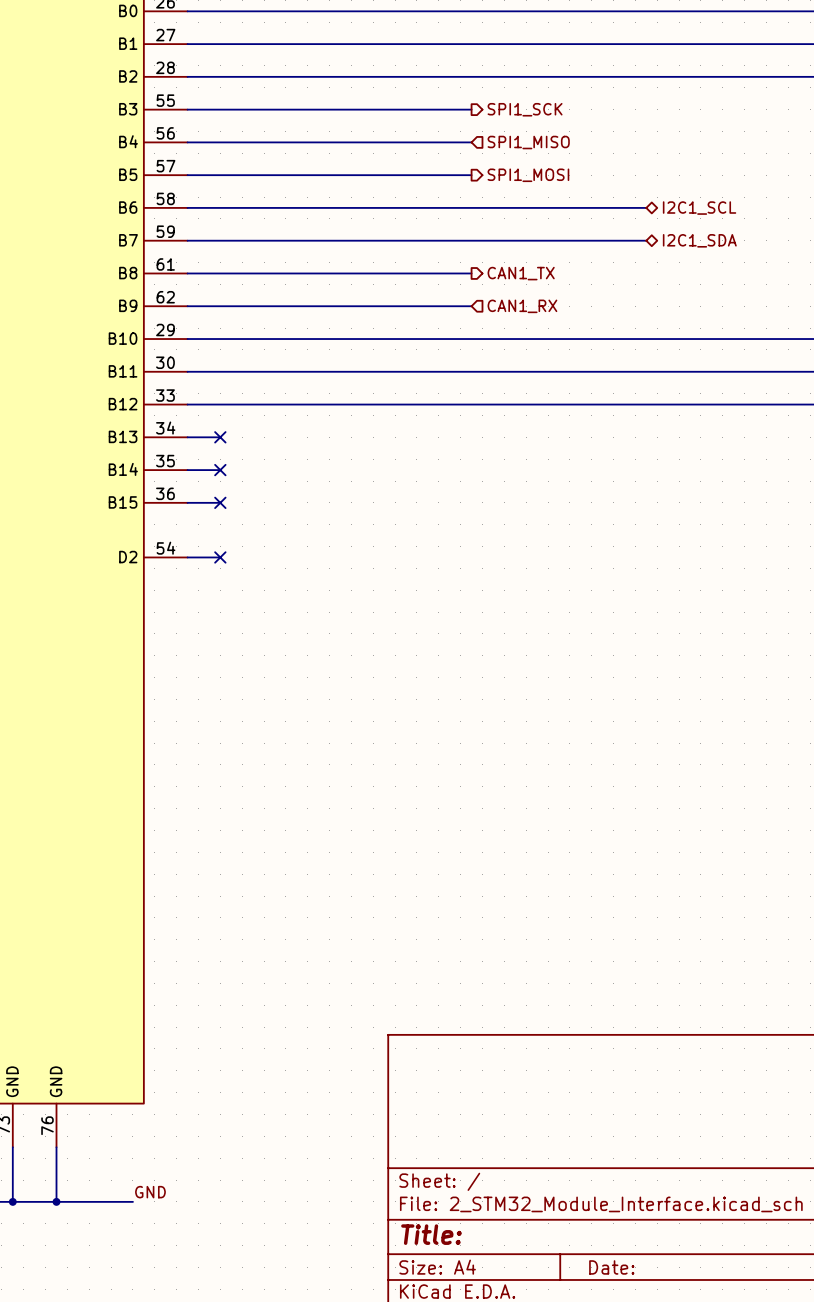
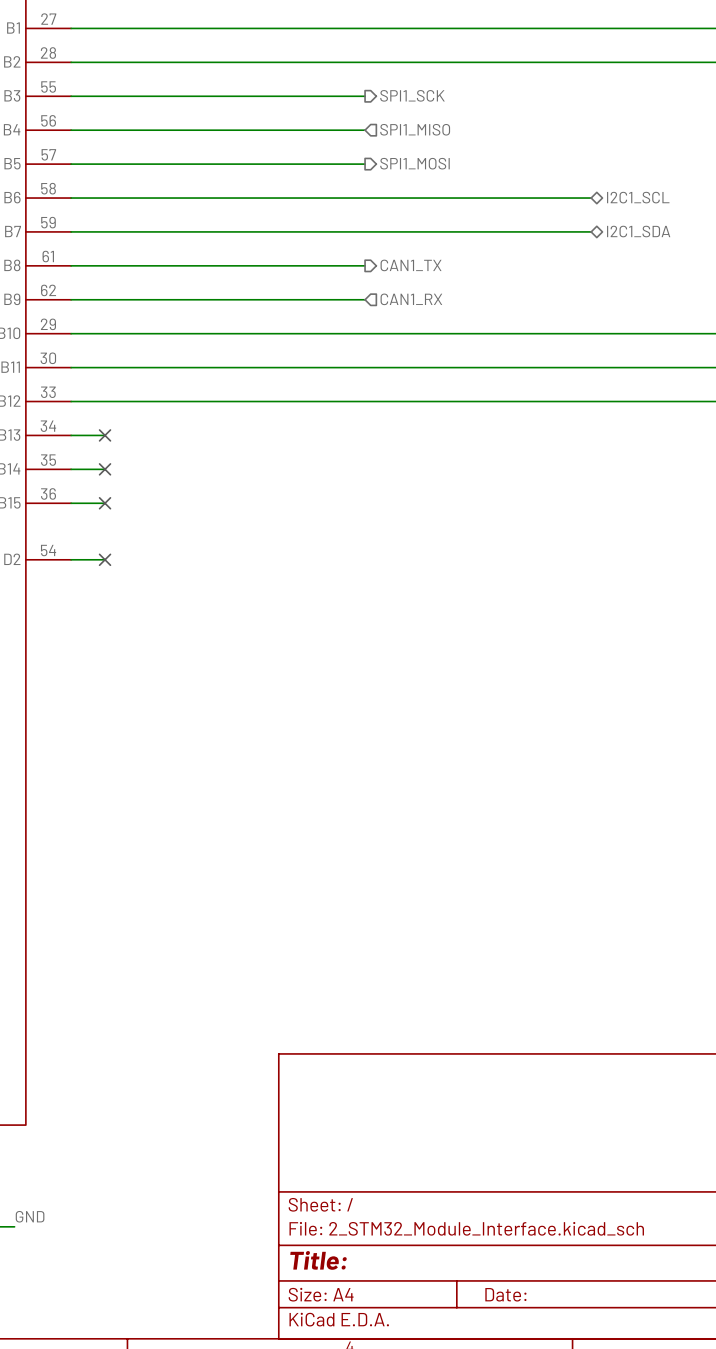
wire: none -> (545, 198) (591, 198)
hierarchical label position: I2C1_SCL (699, 208) -> I2C1_SCL (638, 197)
wire: none -> (545, 231) (591, 231)
hierarchical label position: I2C1_SDA (699, 240) -> I2C1_SDA (638, 231)

